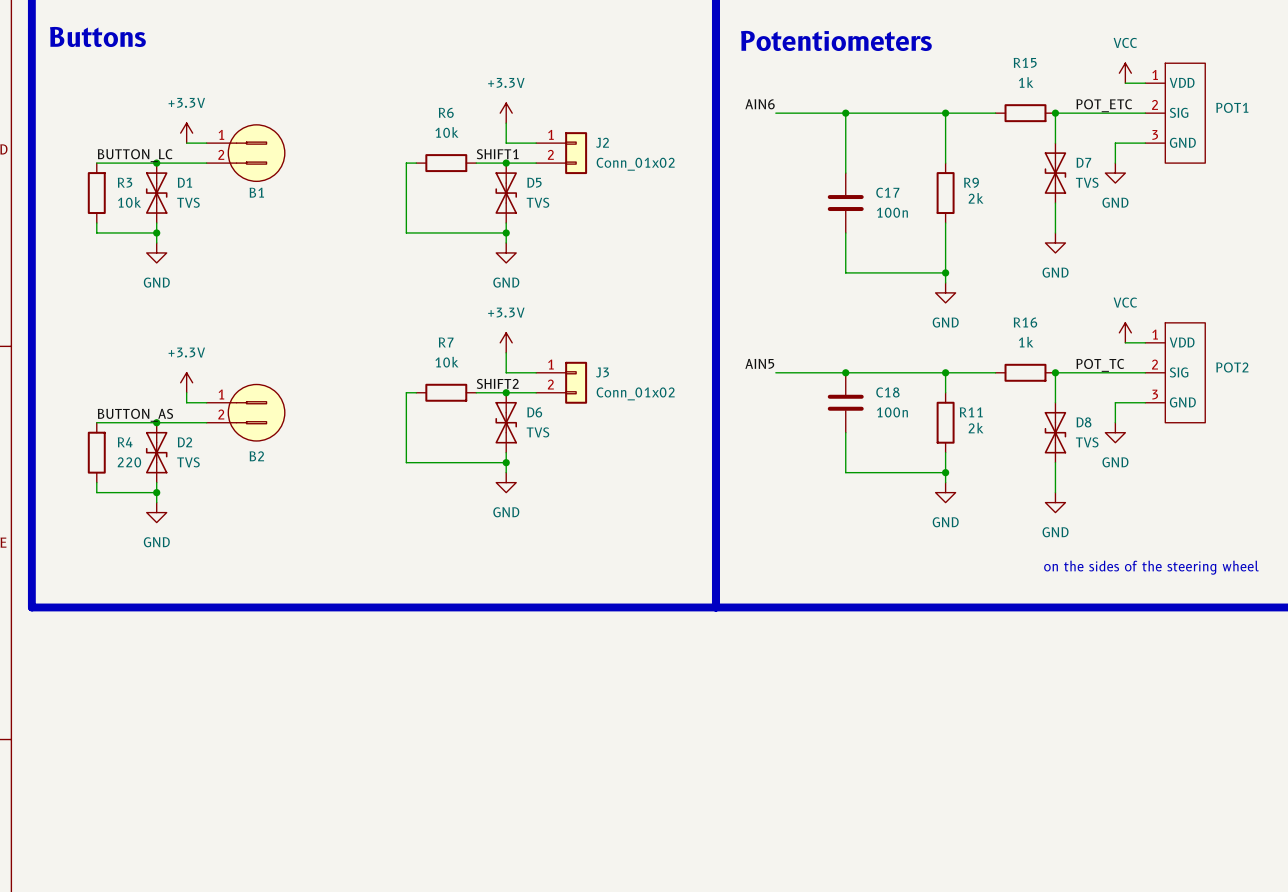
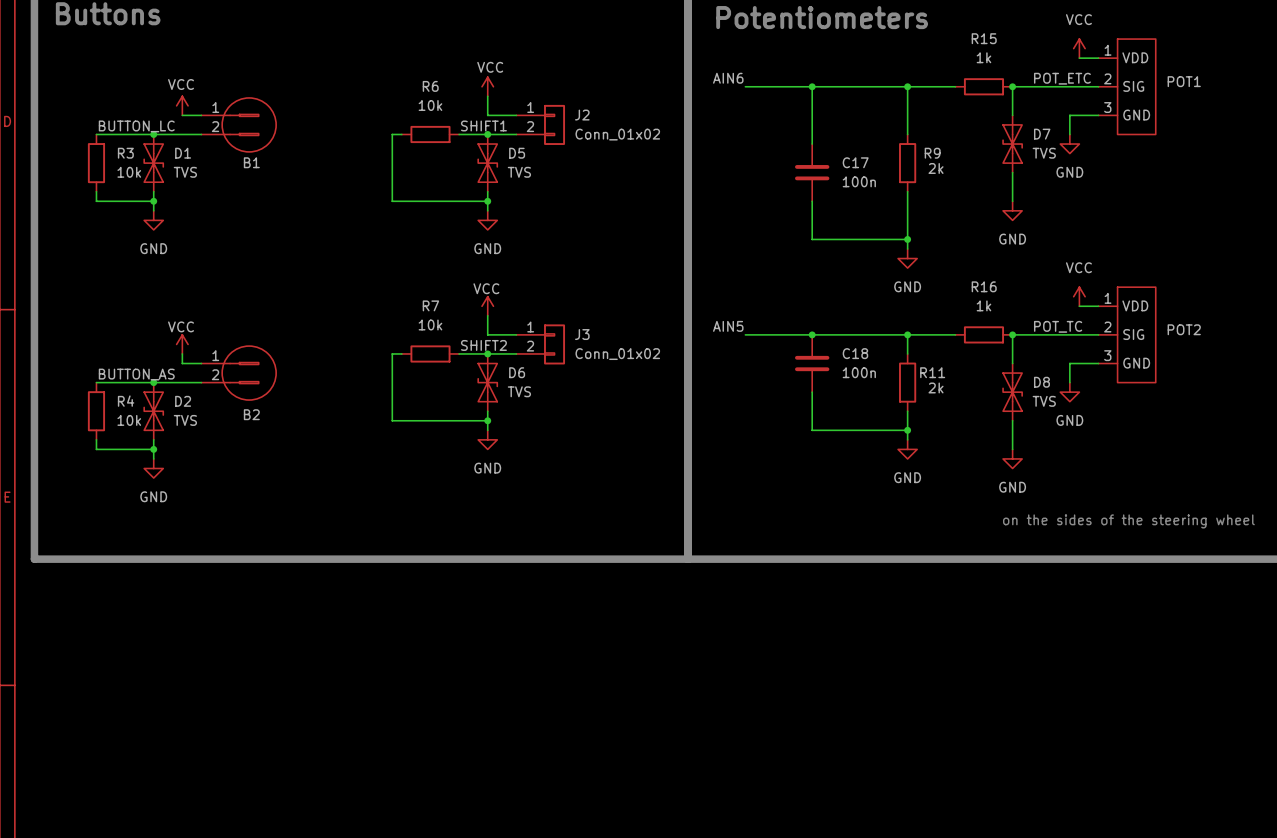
power symbol: +3.3V (506, 113) -> VCC (487, 86)
power symbol: +3.3V (186, 133) -> VCC (182, 105)
power symbol: +3.3V (506, 342) -> VCC (487, 306)
power symbol: +3.3V (186, 382) -> VCC (182, 344)
R4 value: 220 (129, 462) -> 10k (129, 420)

